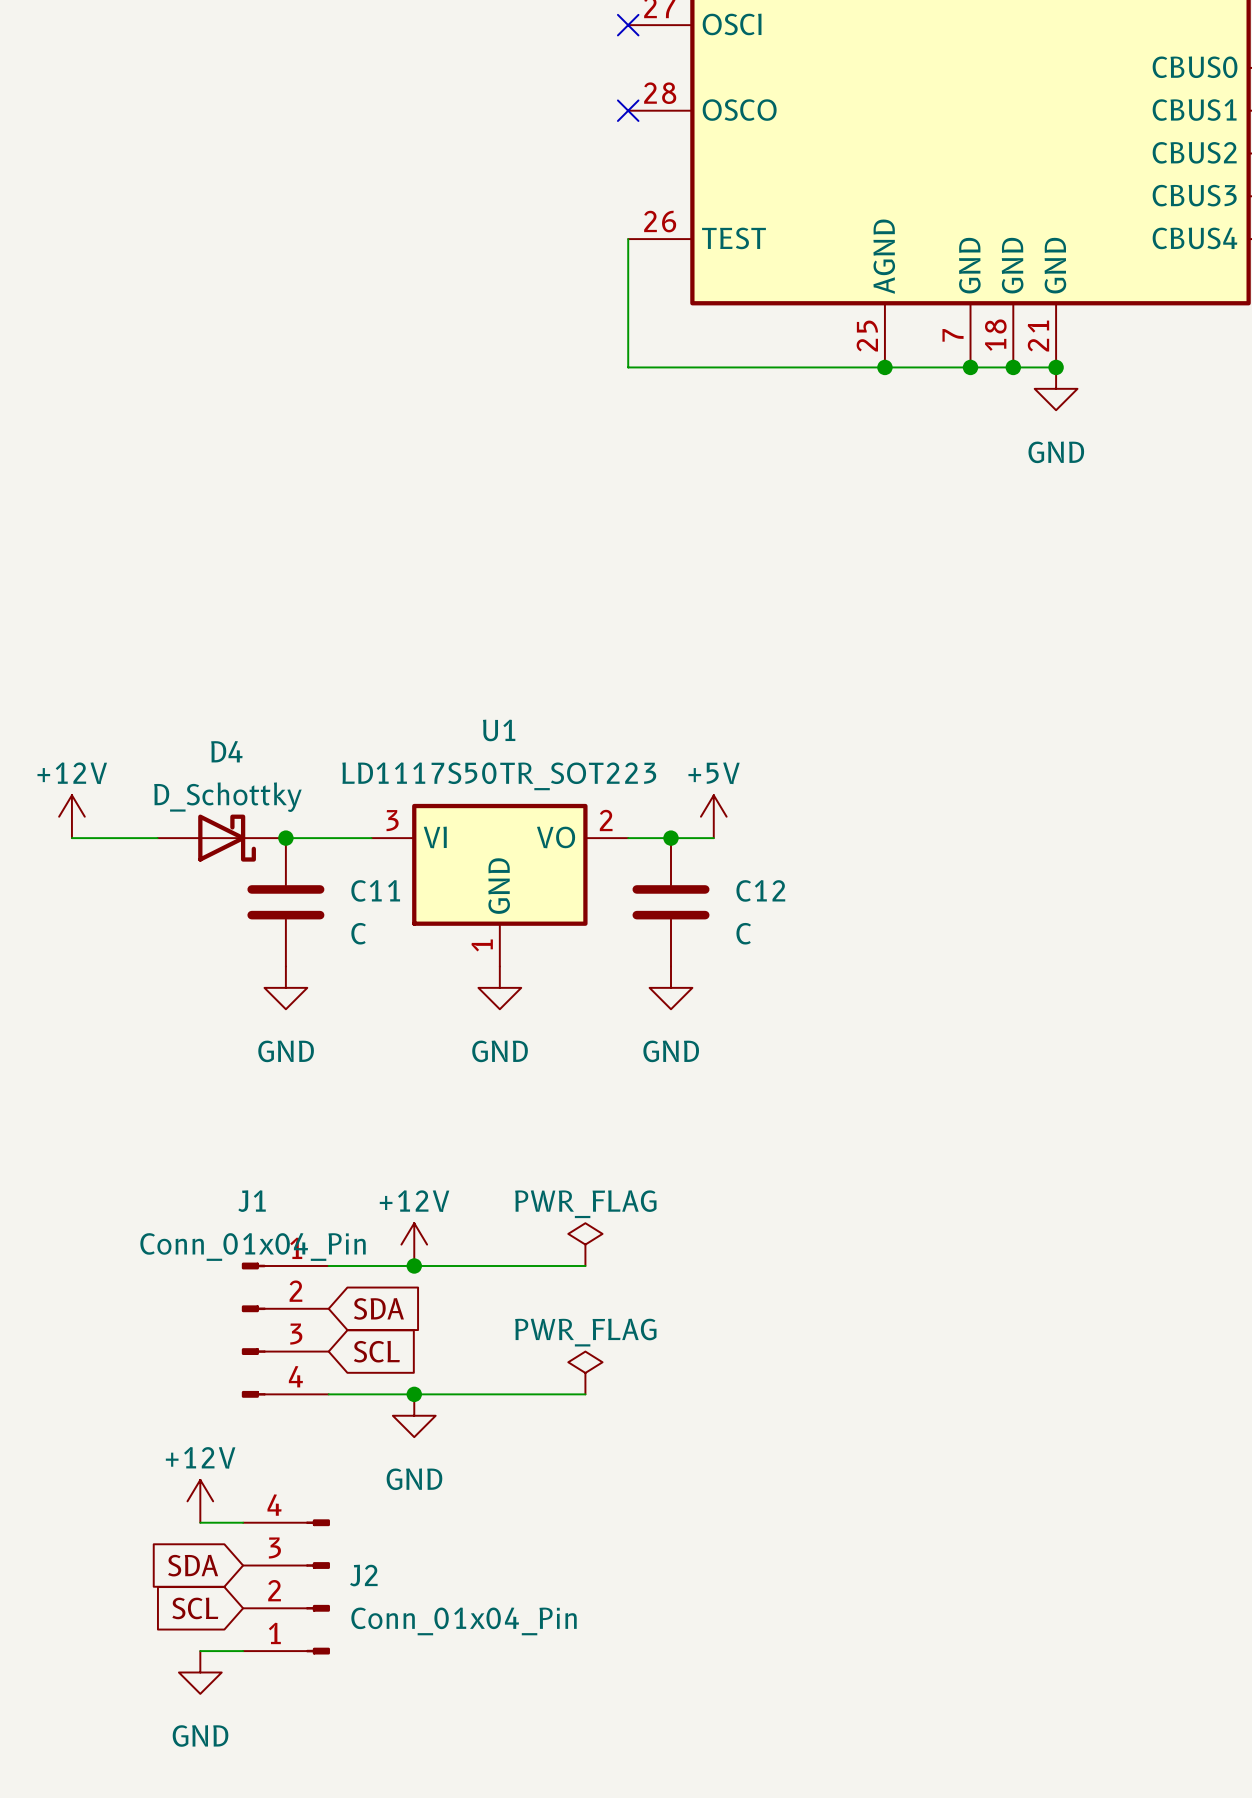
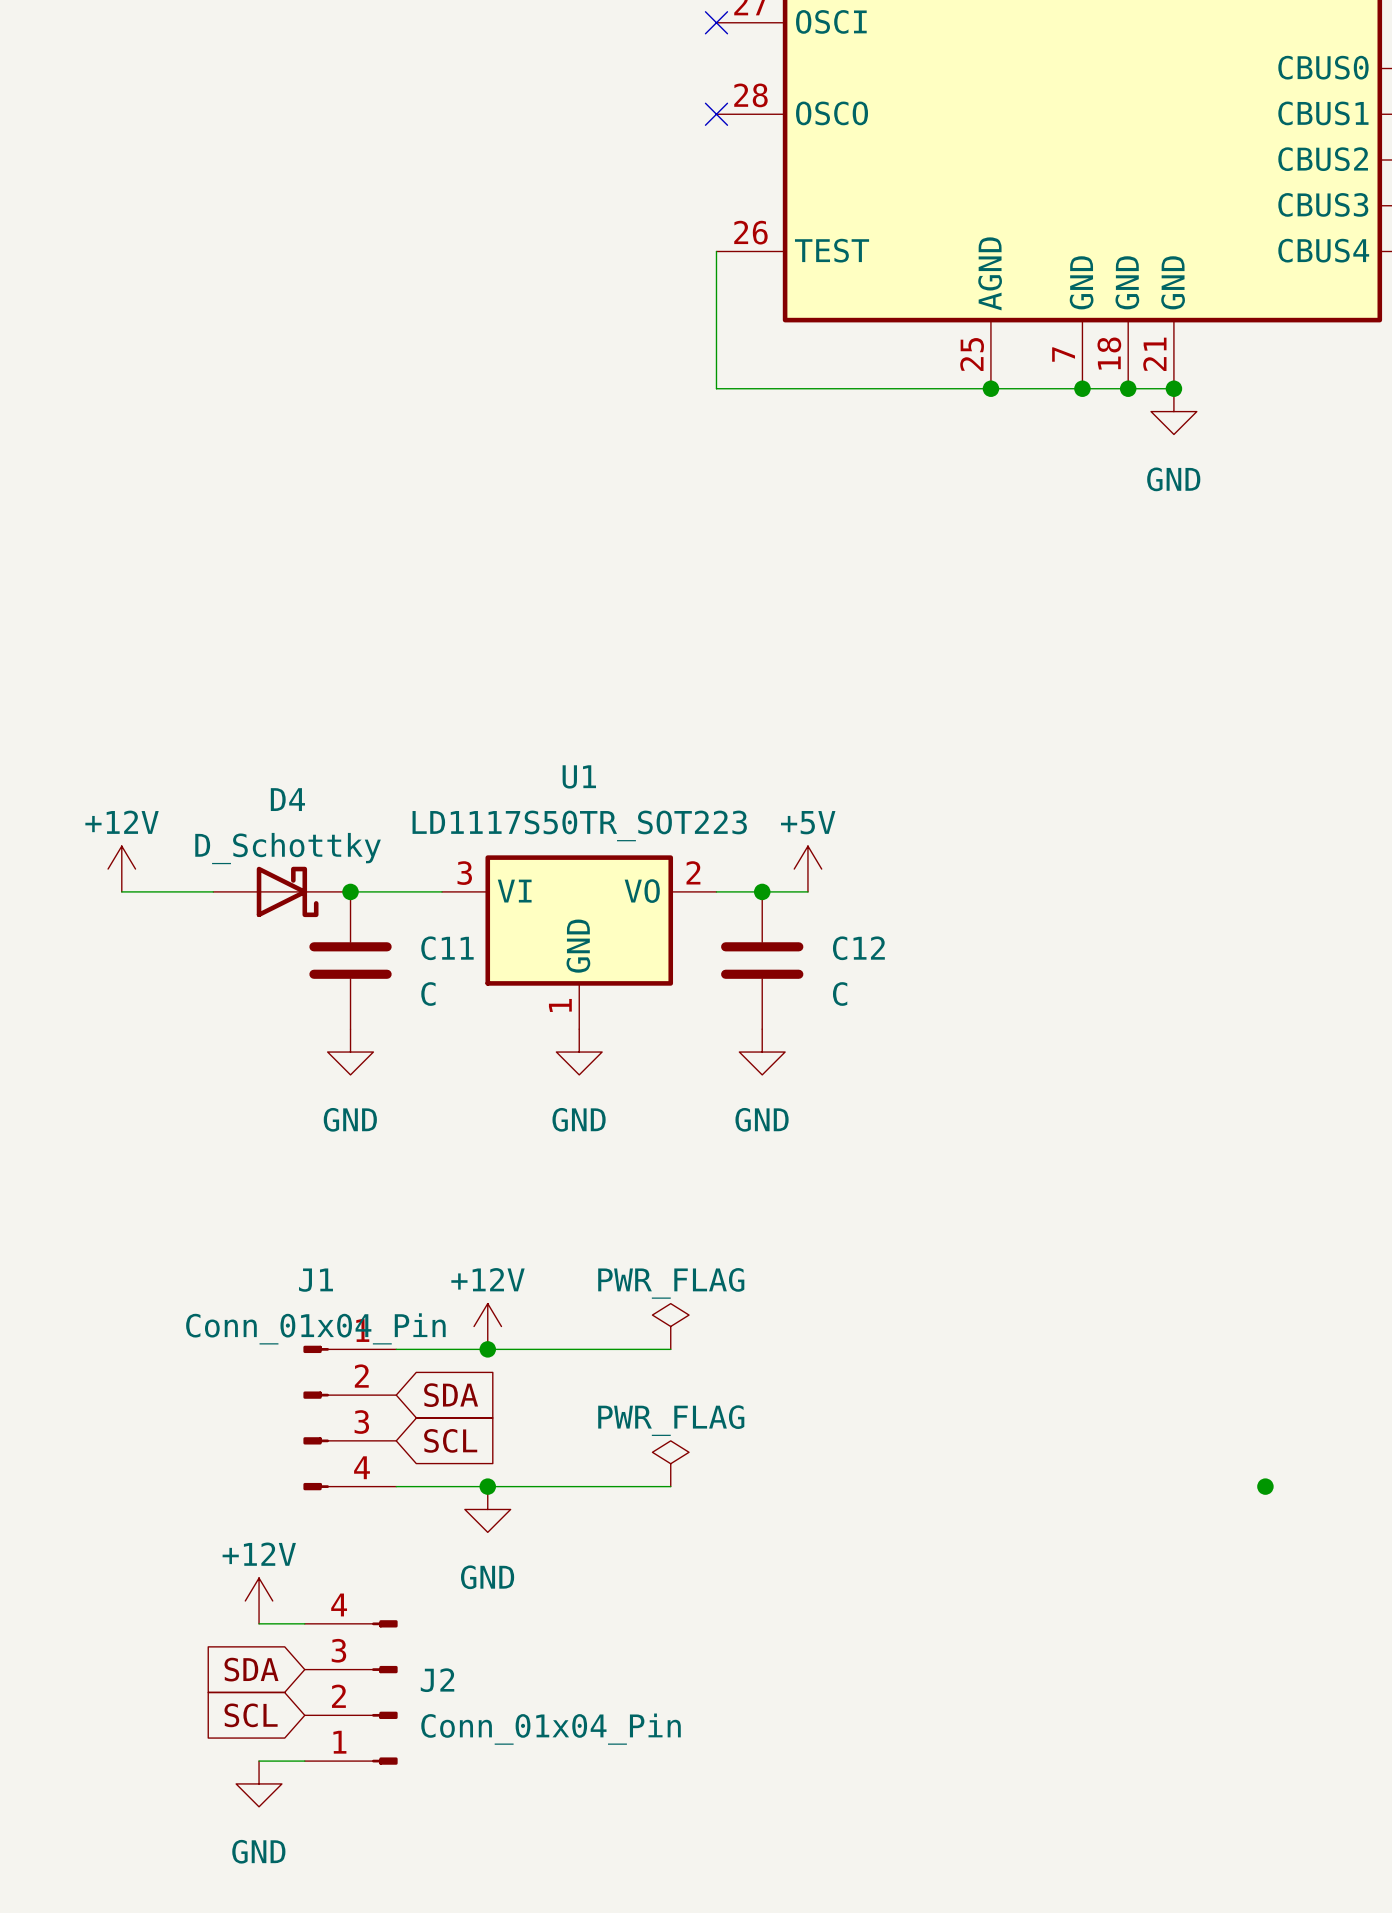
junction: none -> (1265, 1486)

